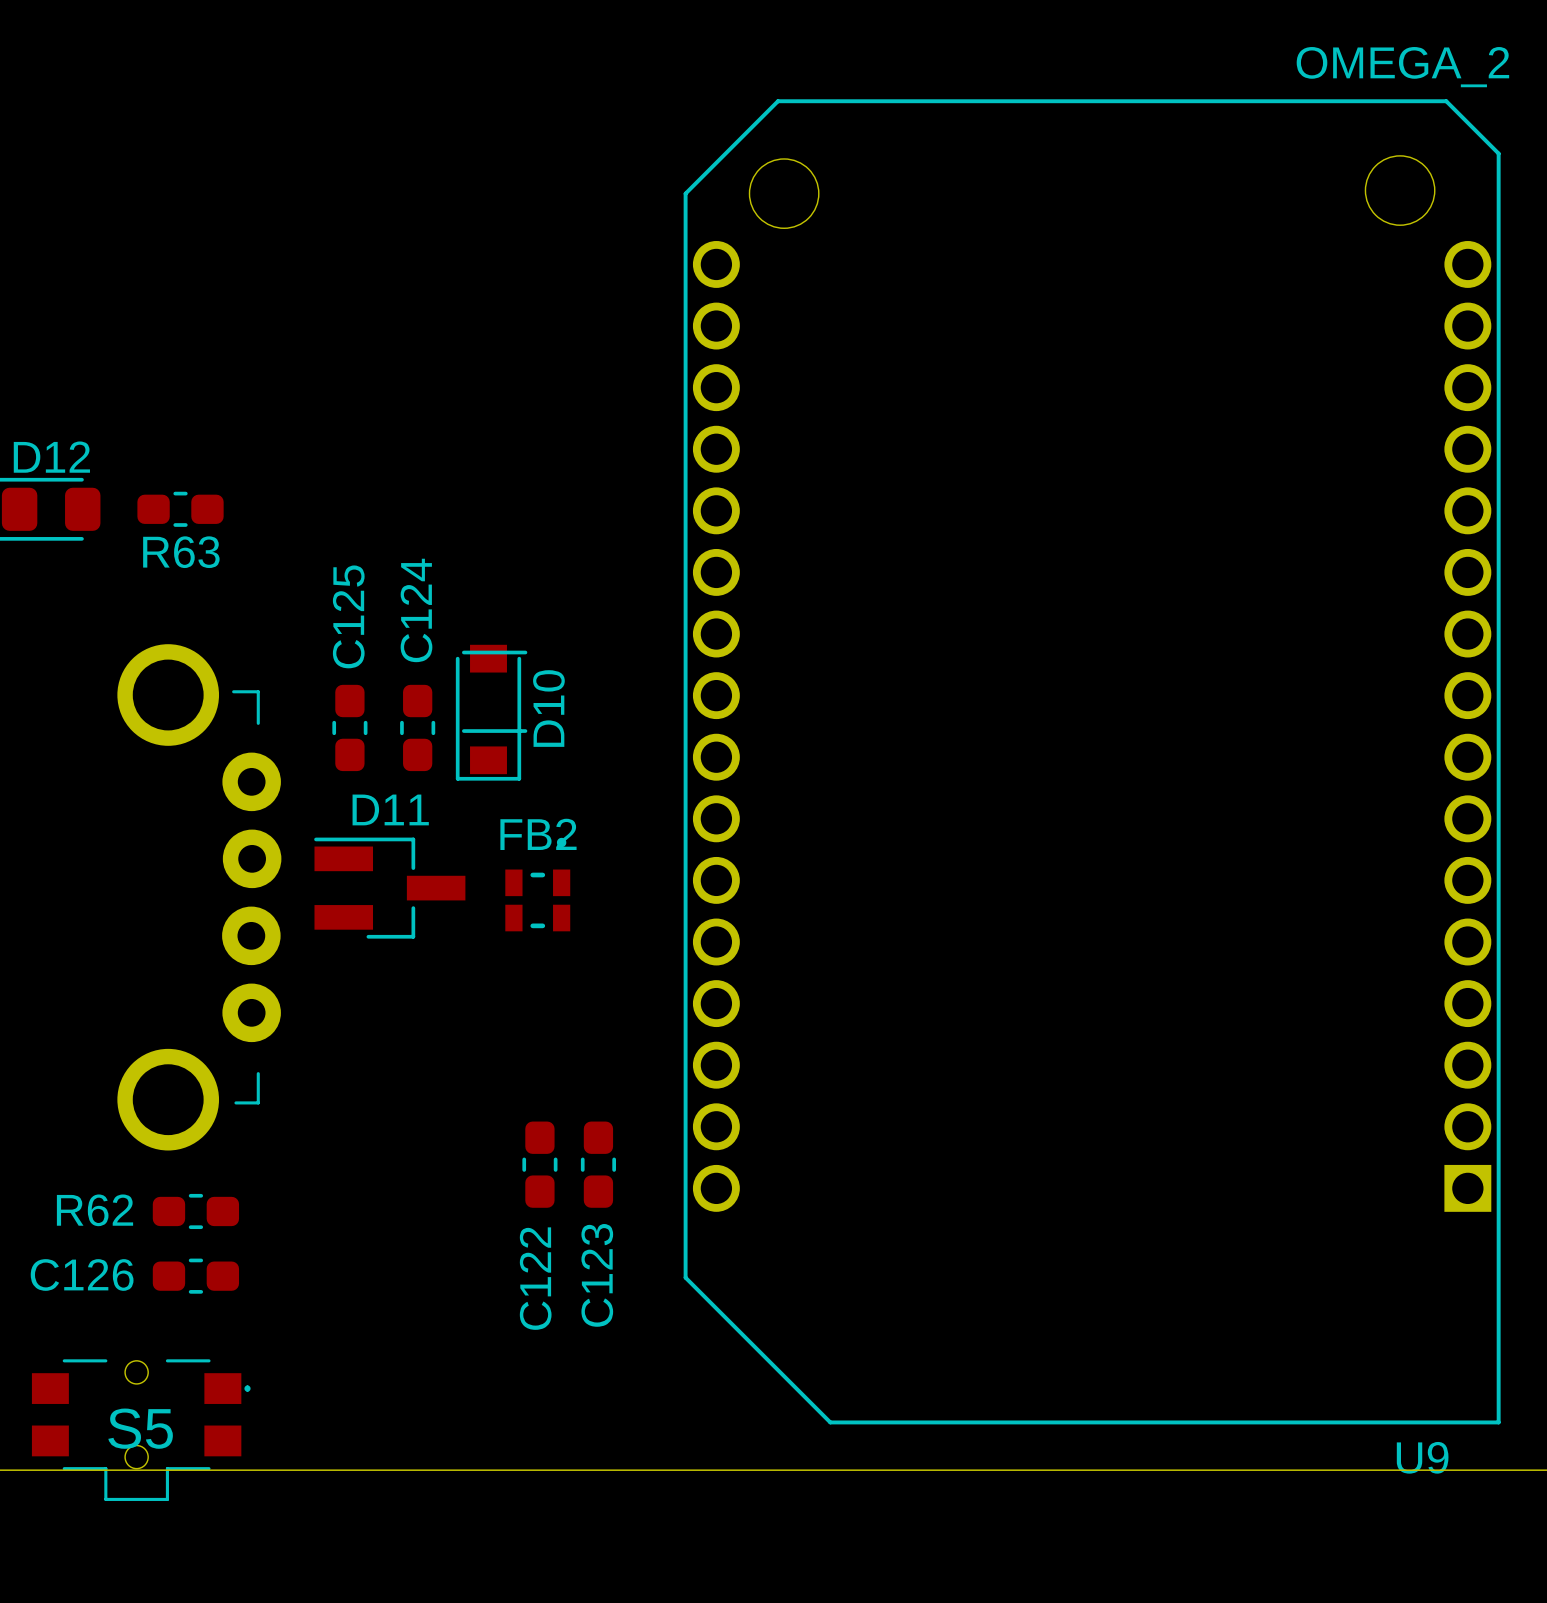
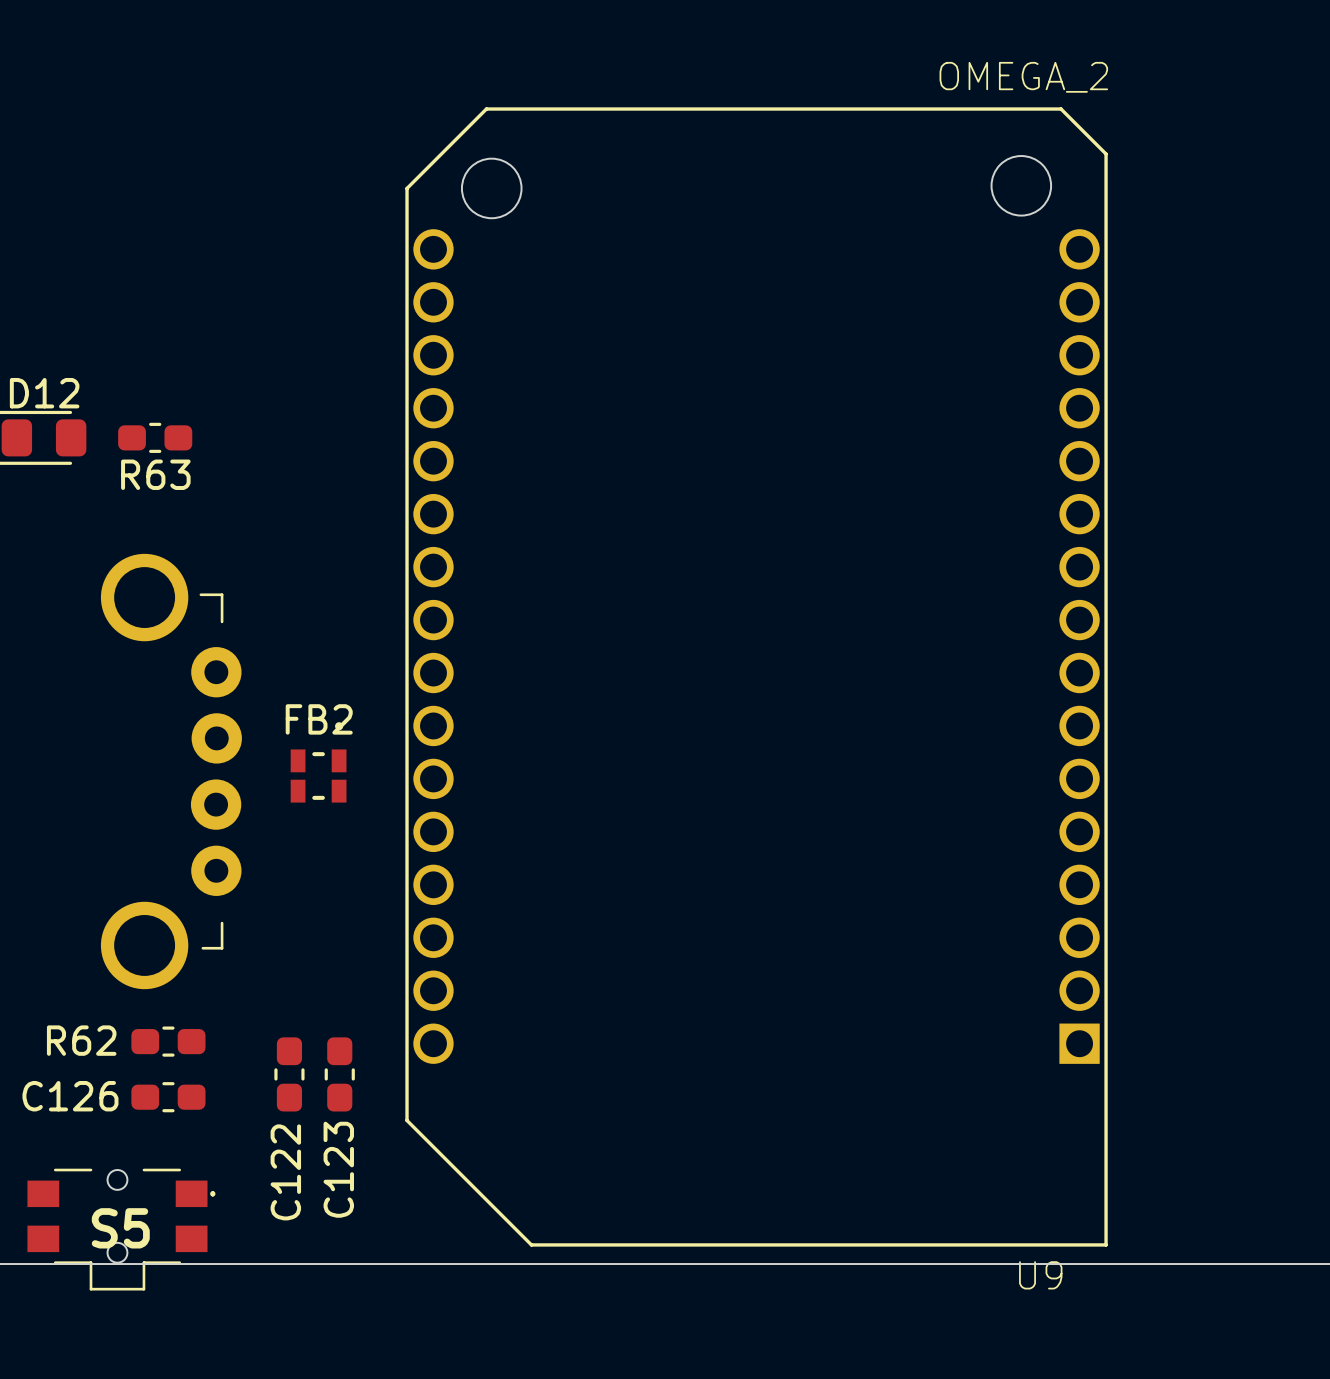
line: (463, 652) (525, 652) -> none
D10: (488, 712) -> none
C125: (349, 727) -> none
C124: (417, 727) -> none
line: (463, 731) (525, 731) -> none
U9 position: (1092, 761) -> (756, 676)
FB2 position: (537, 884) -> (318, 762)
D11: (389, 888) -> none
C122 position: (539, 1164) -> (289, 1074)
C123 position: (598, 1164) -> (339, 1074)

